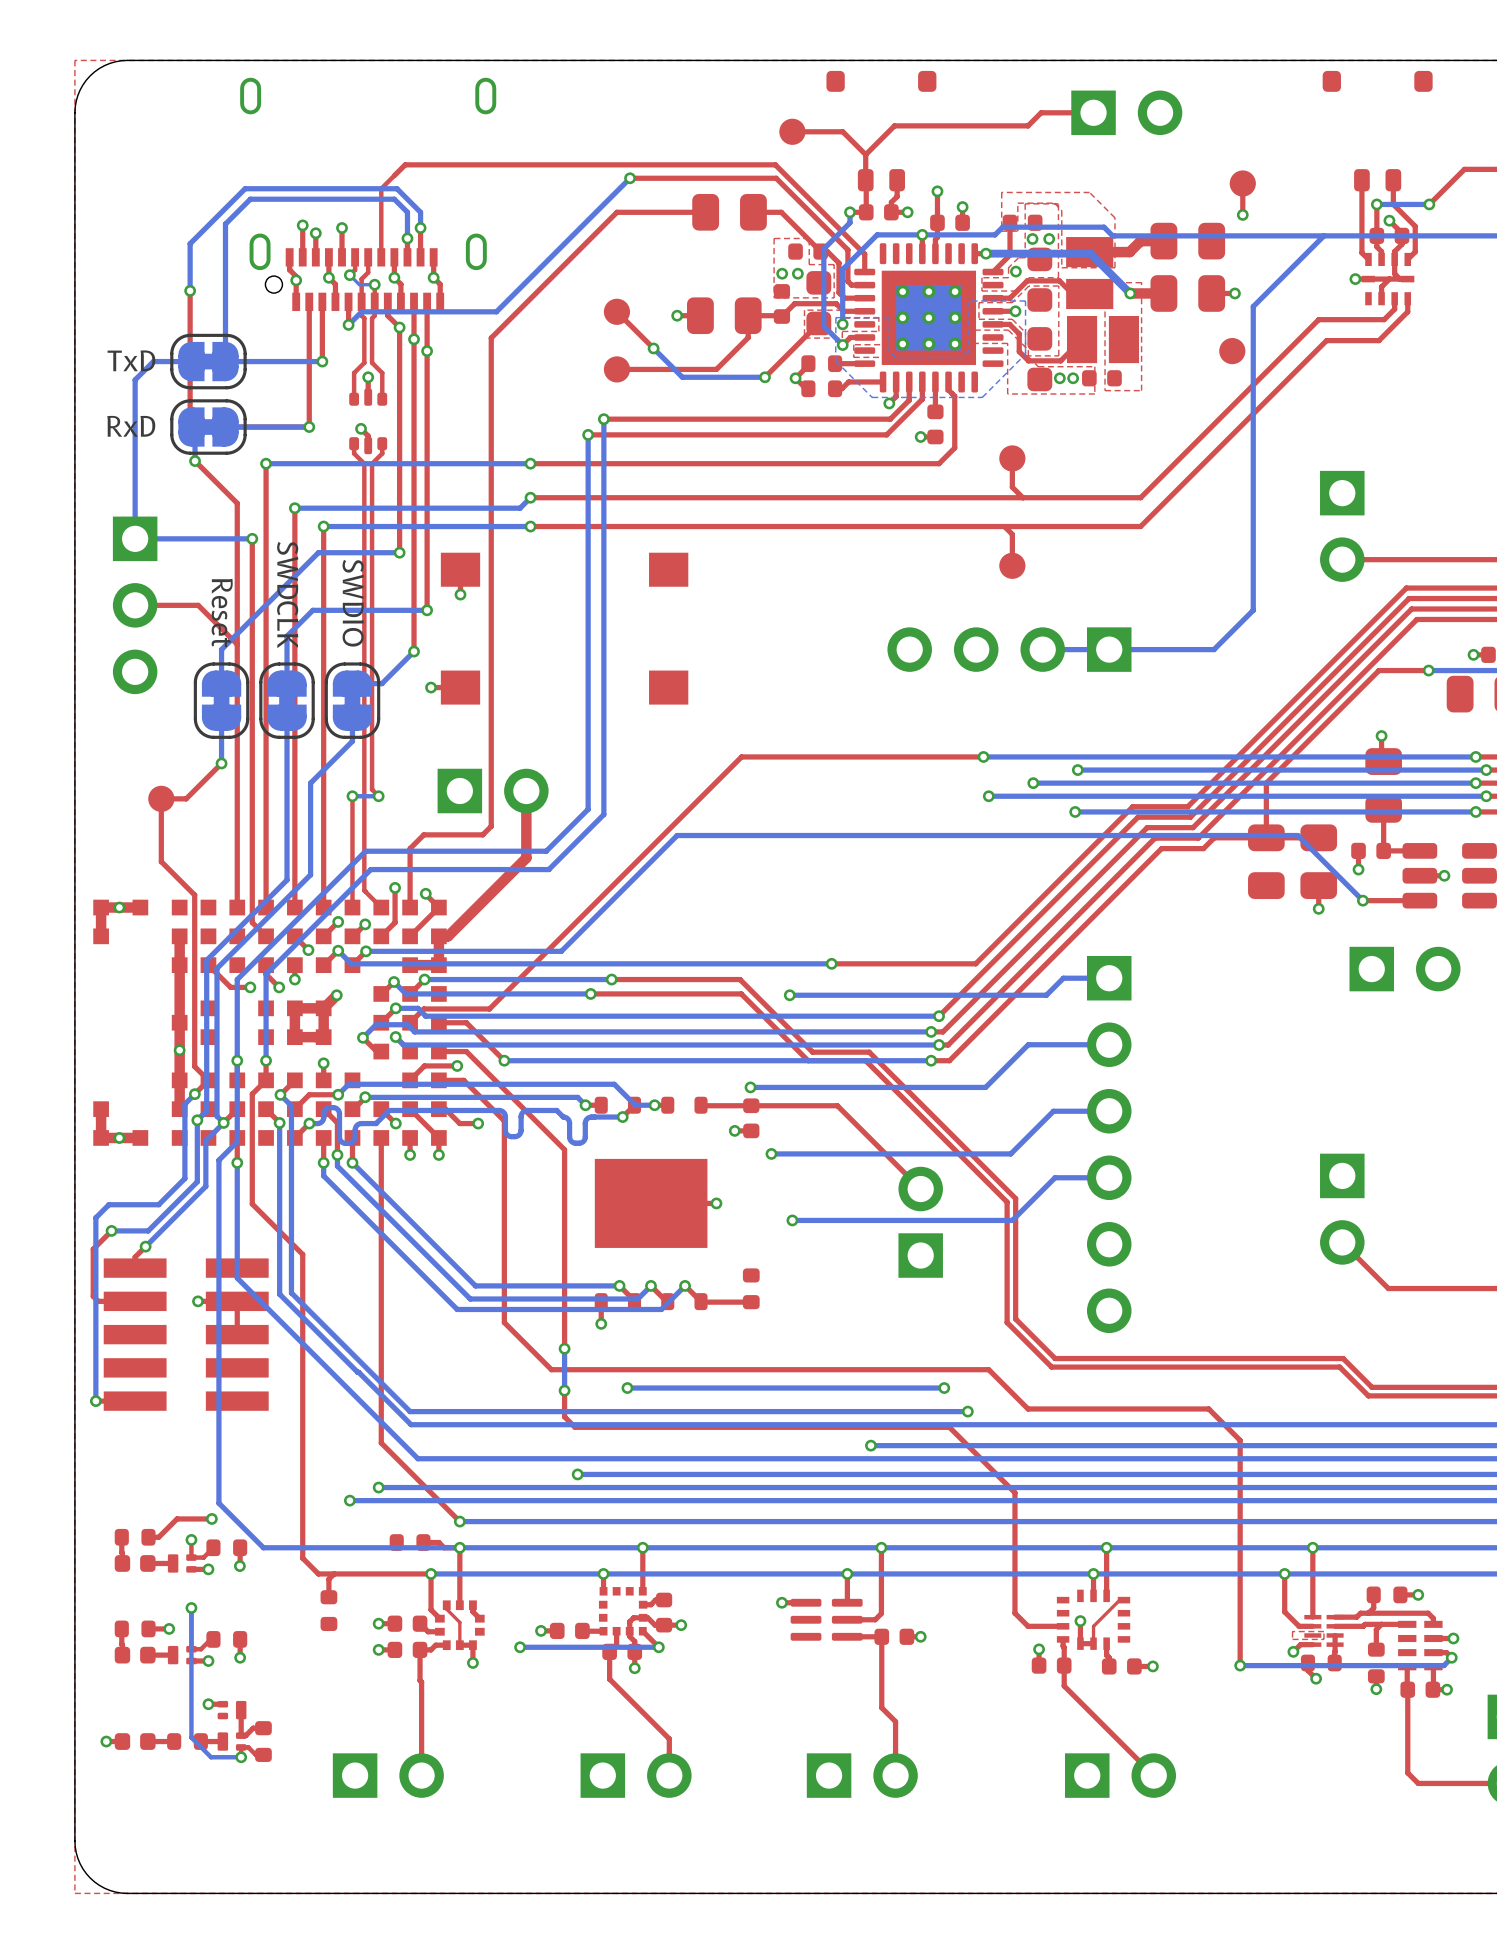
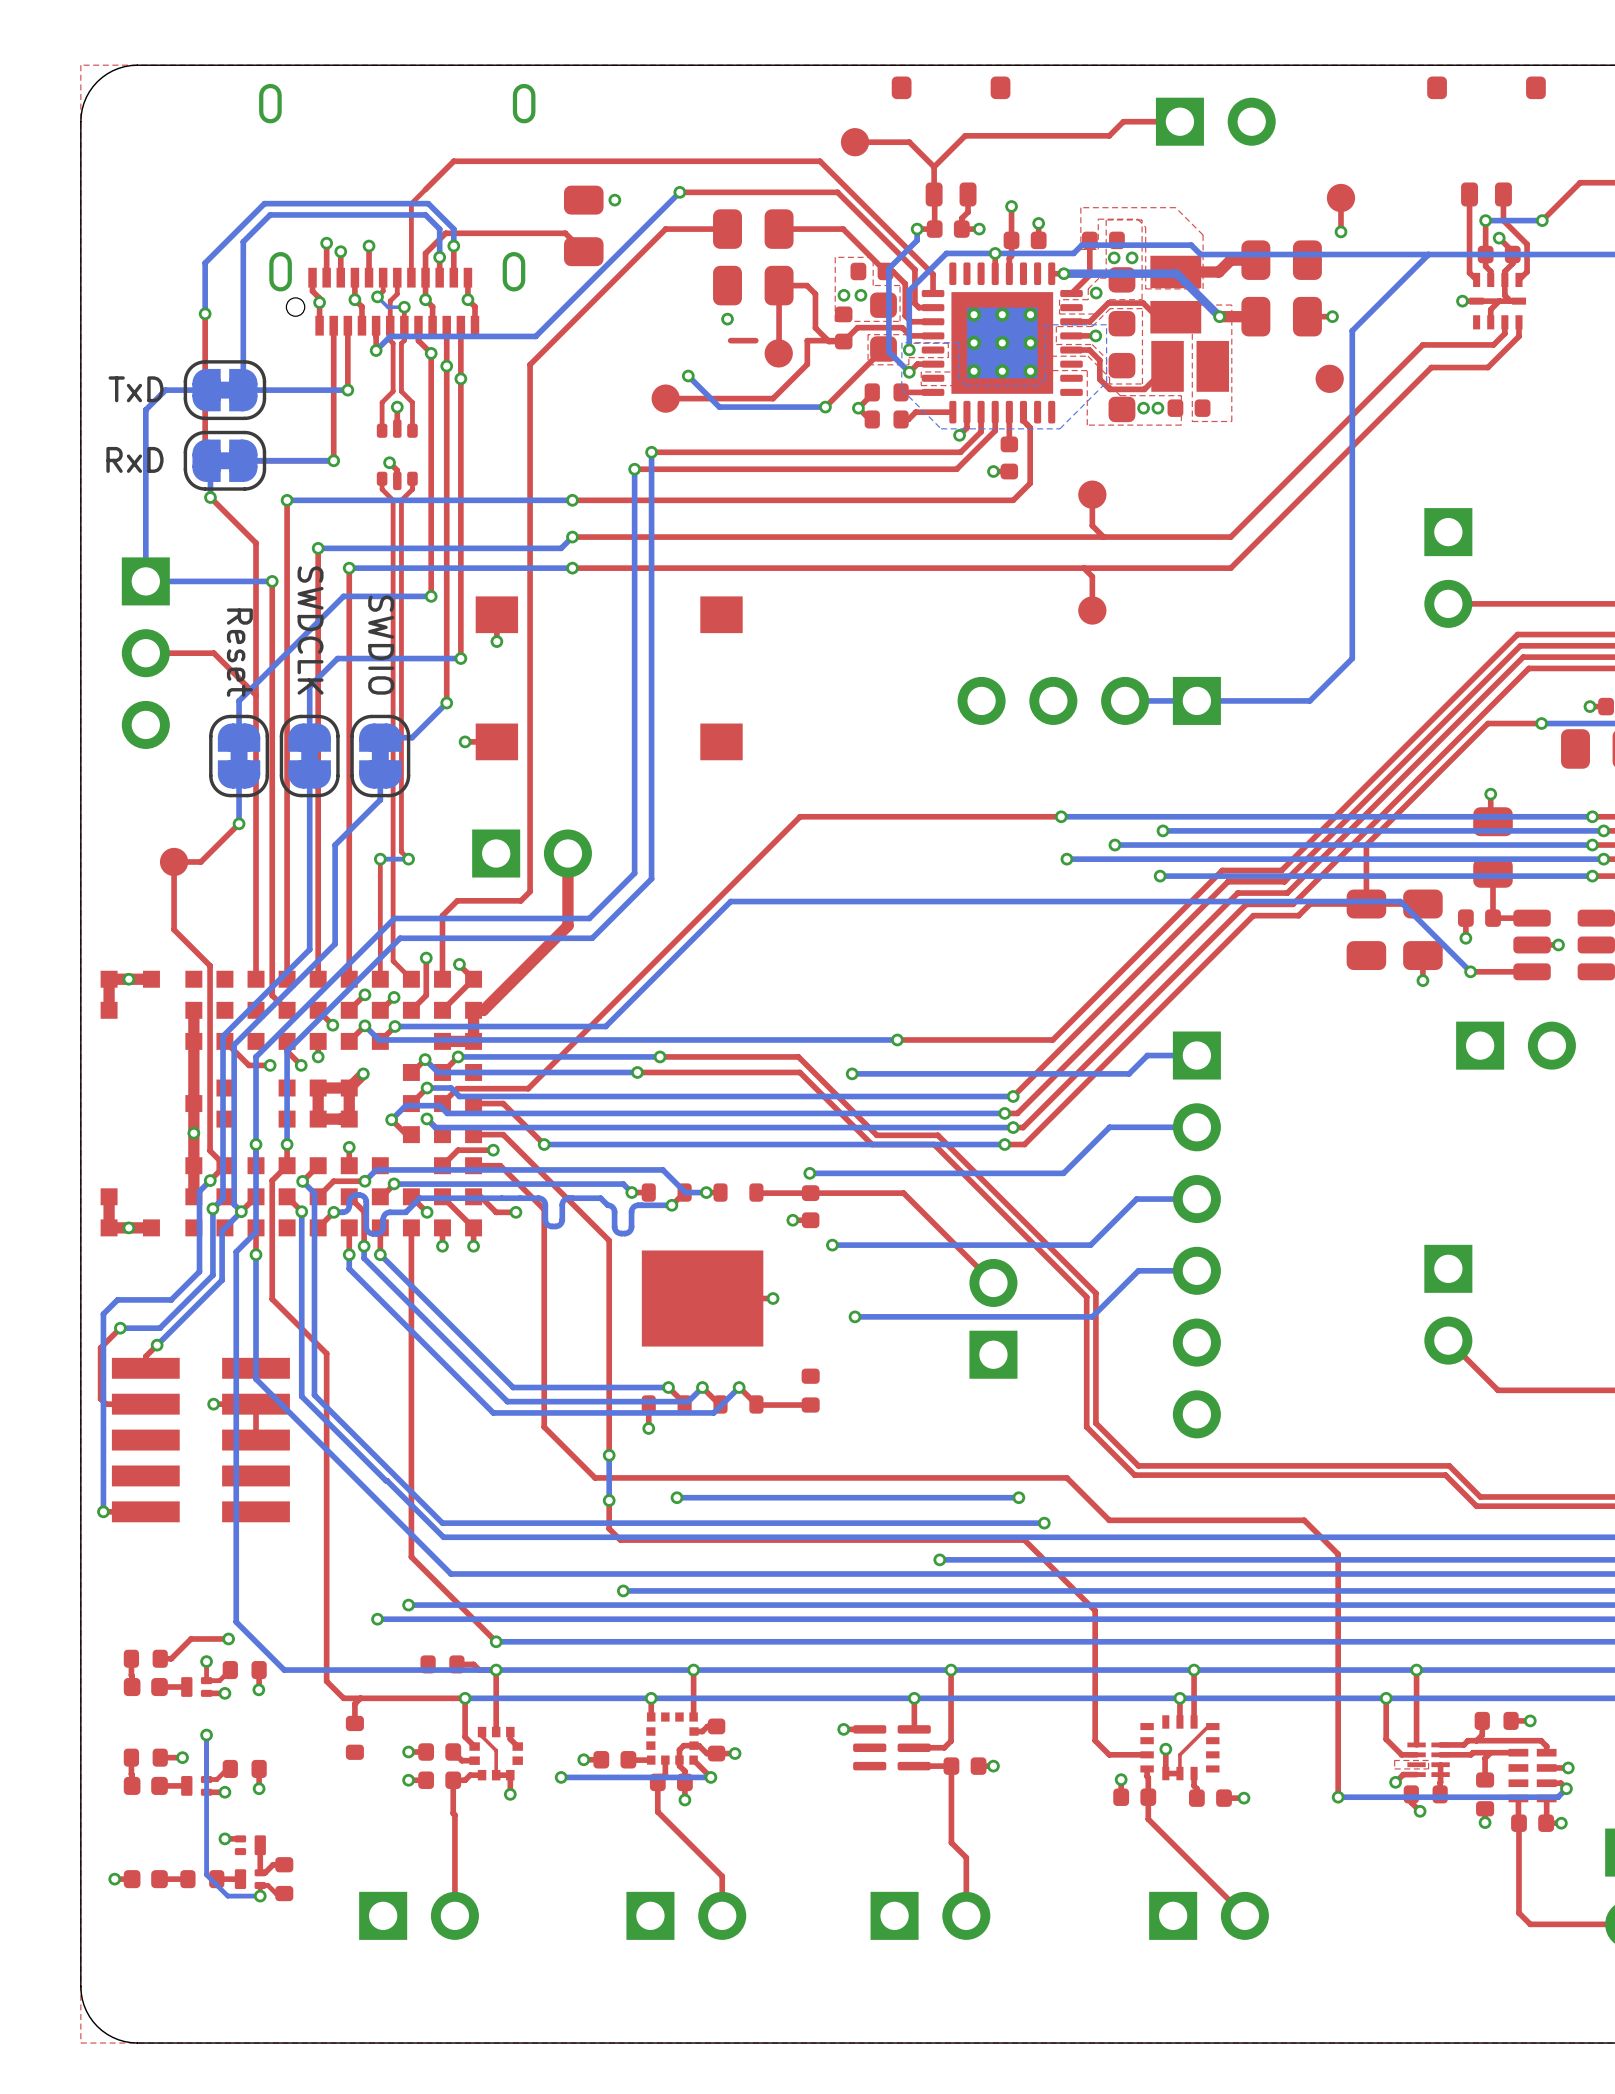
top track: (775, 164) (405, 164) -> (836, 177) (820, 161) (453, 161) (437, 177)
via: none -> (614, 200)
part: none -> (583, 225)
part: none -> (753, 229)
top track: (705, 212) (674, 212) -> (812, 229) (779, 229)
part: (729, 212) -> none
top track: none -> (583, 251) (565, 233) (445, 233) (425, 253) (425, 277)
part: none -> (753, 285)
part footprint: [687, 297, 762, 335] -> [764, 339, 793, 368]
top track: (616, 311) (653, 348) -> none
part: (616, 311) -> none
via position: (677, 315) -> (727, 319)
top track: none -> (843, 341) (829, 341) (815, 327) (815, 294) (806, 285) (779, 285) (779, 353)
bottom track: (653, 348) (682, 377) -> (688, 376) (719, 407) (736, 407)
via position: (653, 348) -> (688, 376)

